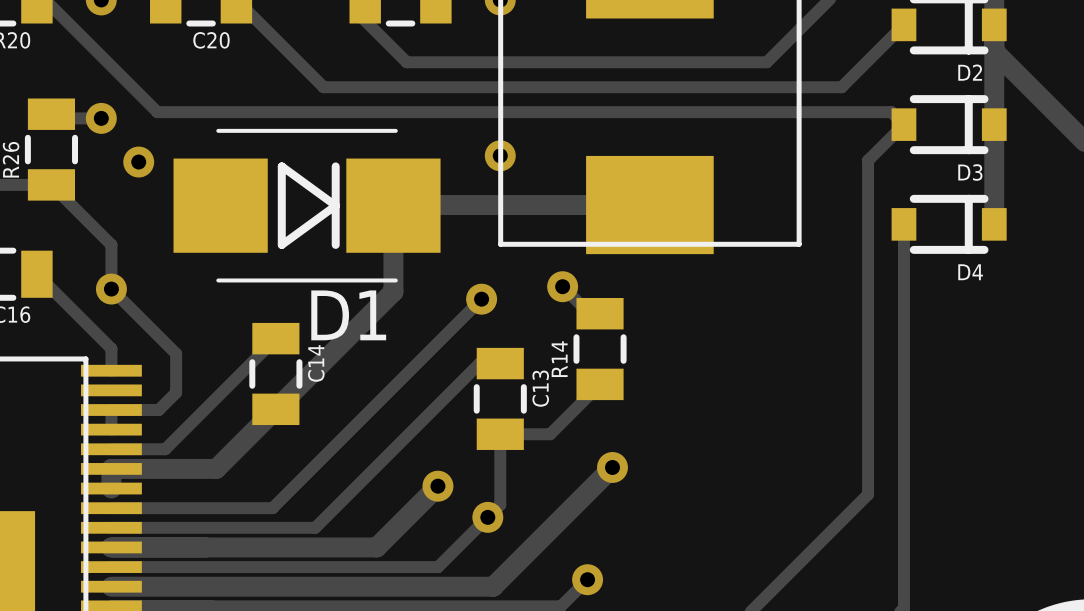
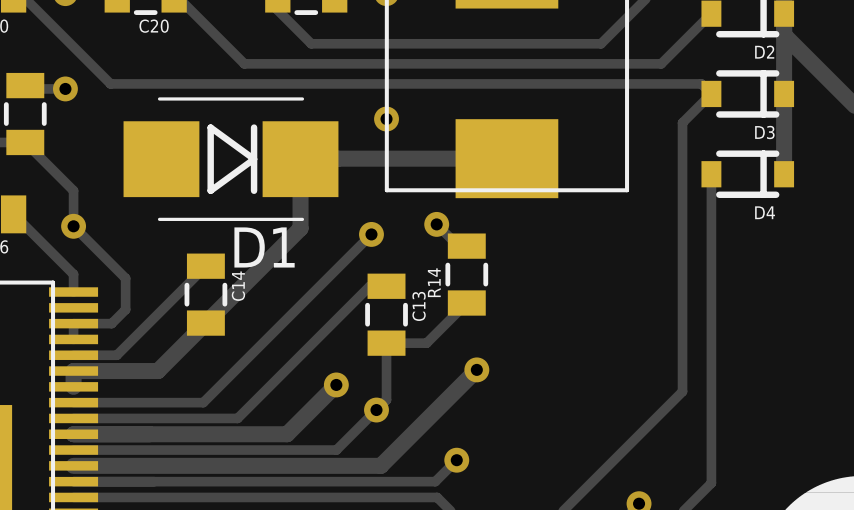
via: (138, 162) -> none

